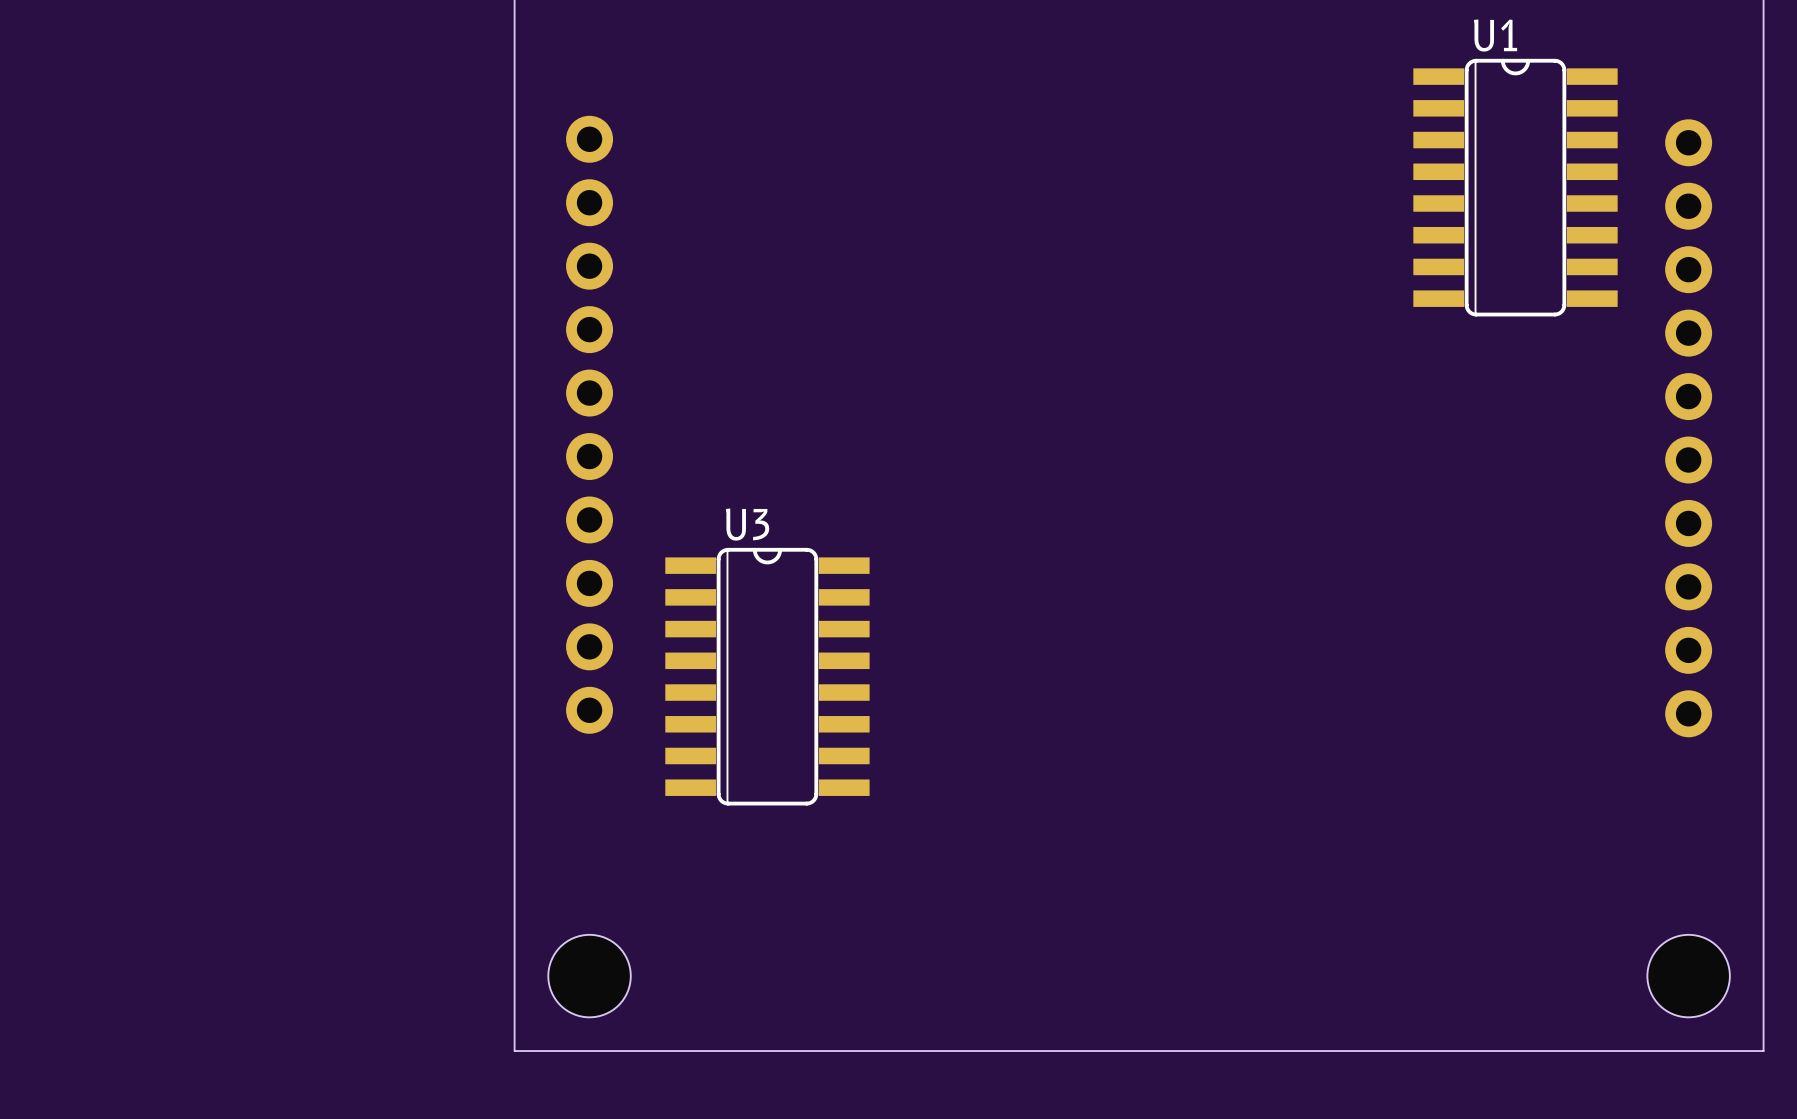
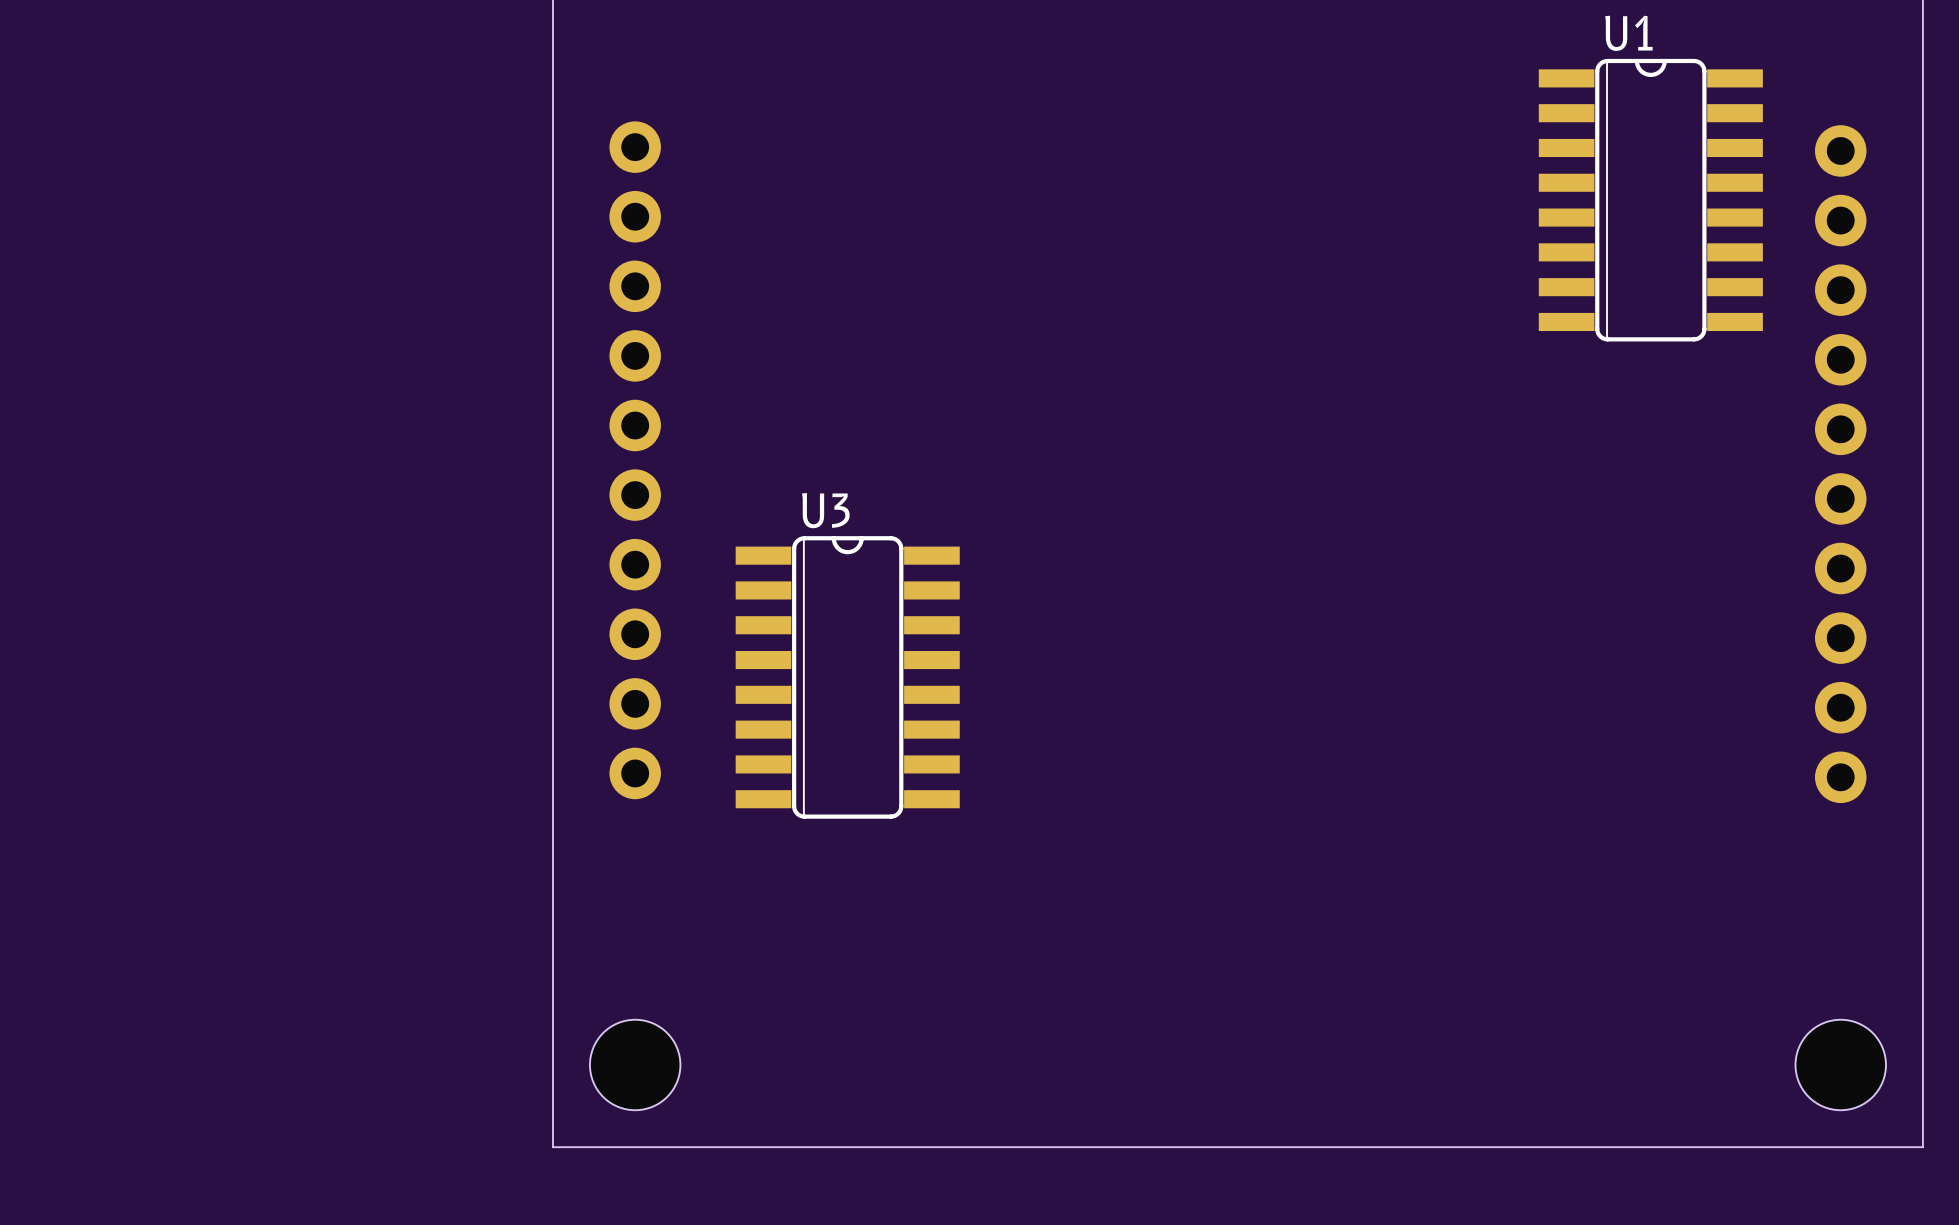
U3 position: (767, 676) -> (847, 677)

